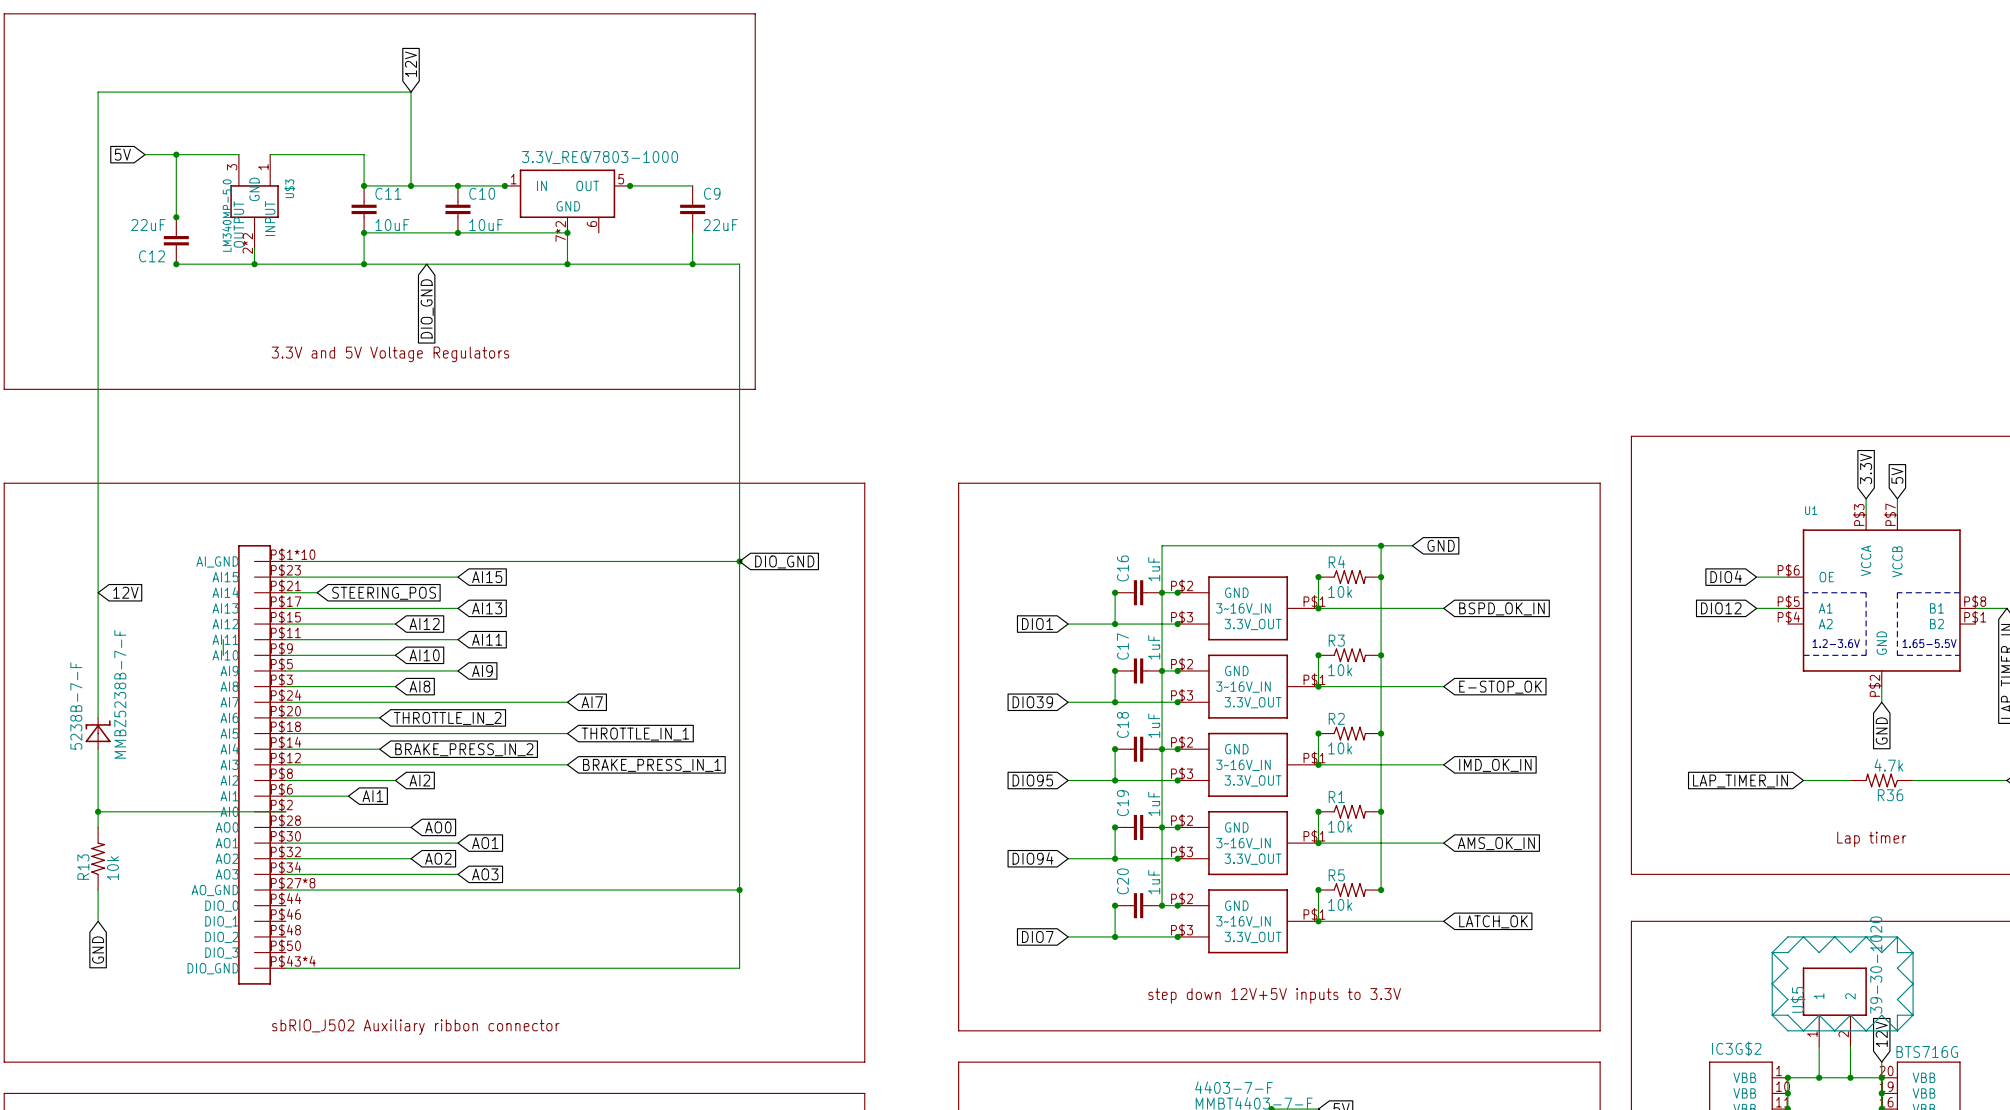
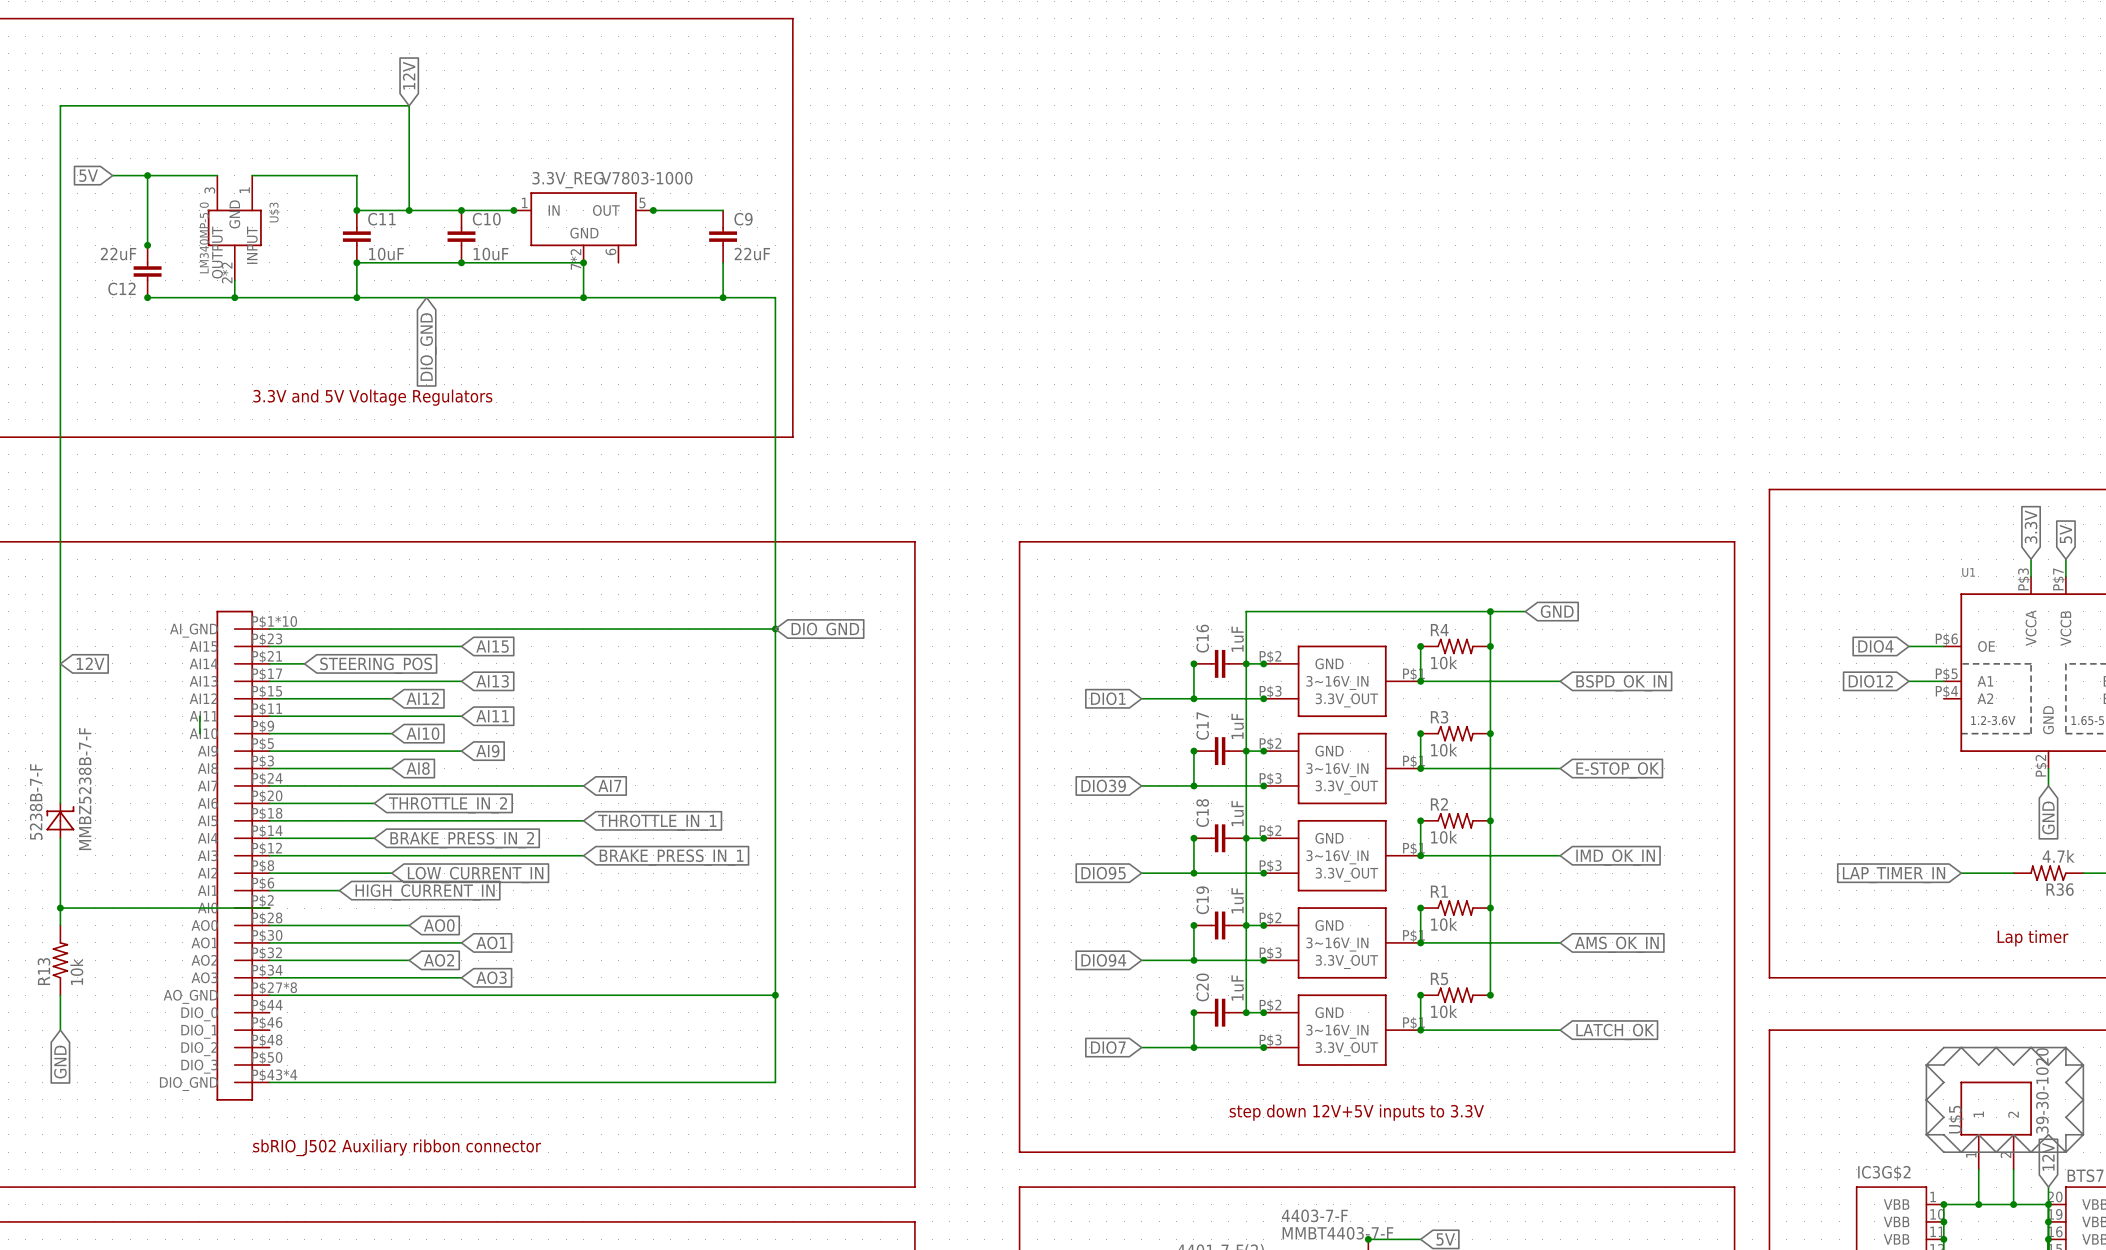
global label: AI2 (419, 780) -> LOW_CURRENT_IN (475, 875)
global label: AI1 (372, 796) -> HIGH_CURRENT_IN (425, 892)

